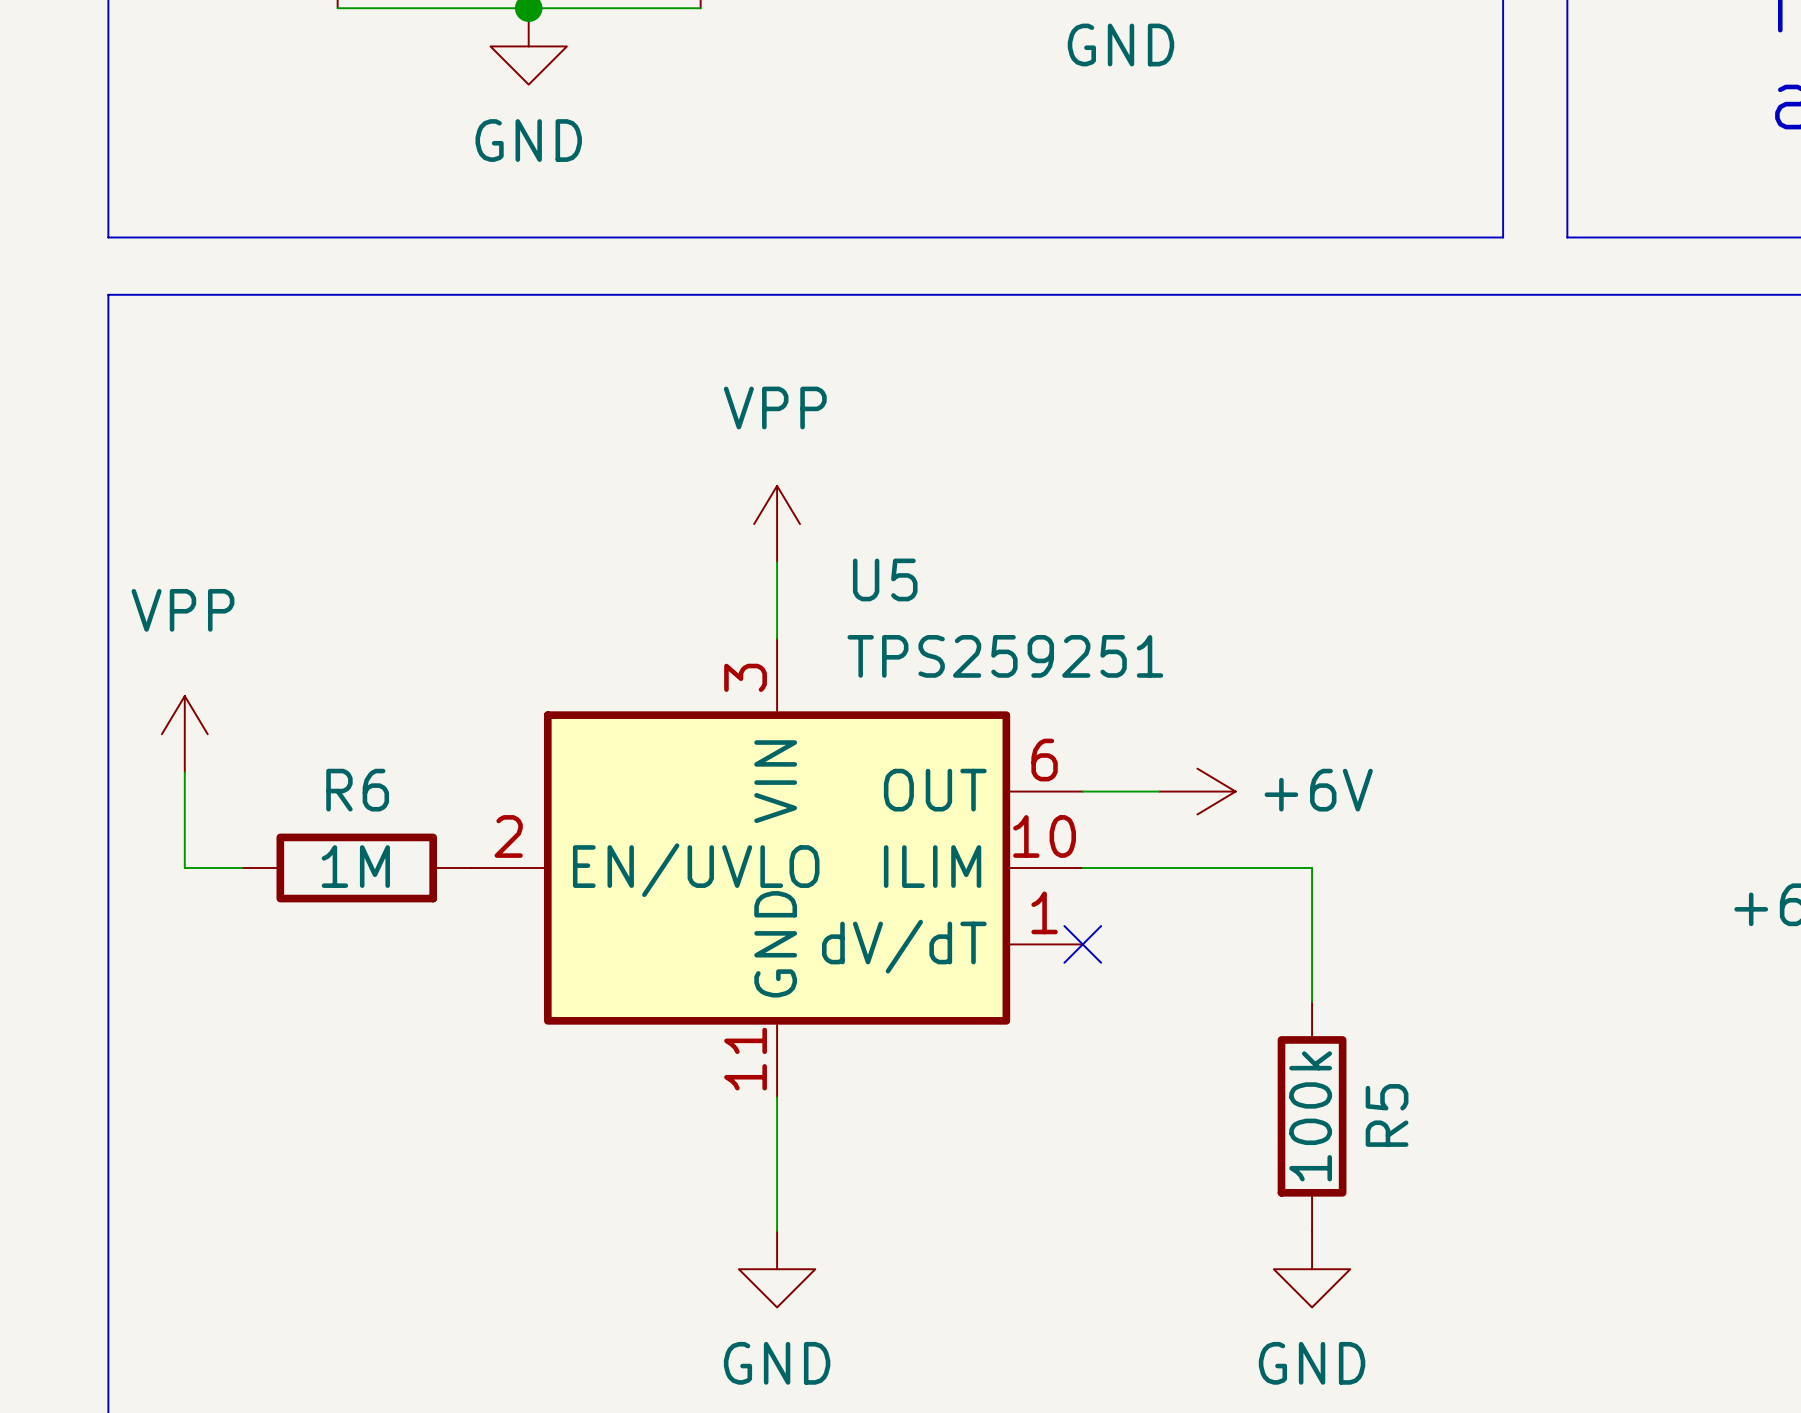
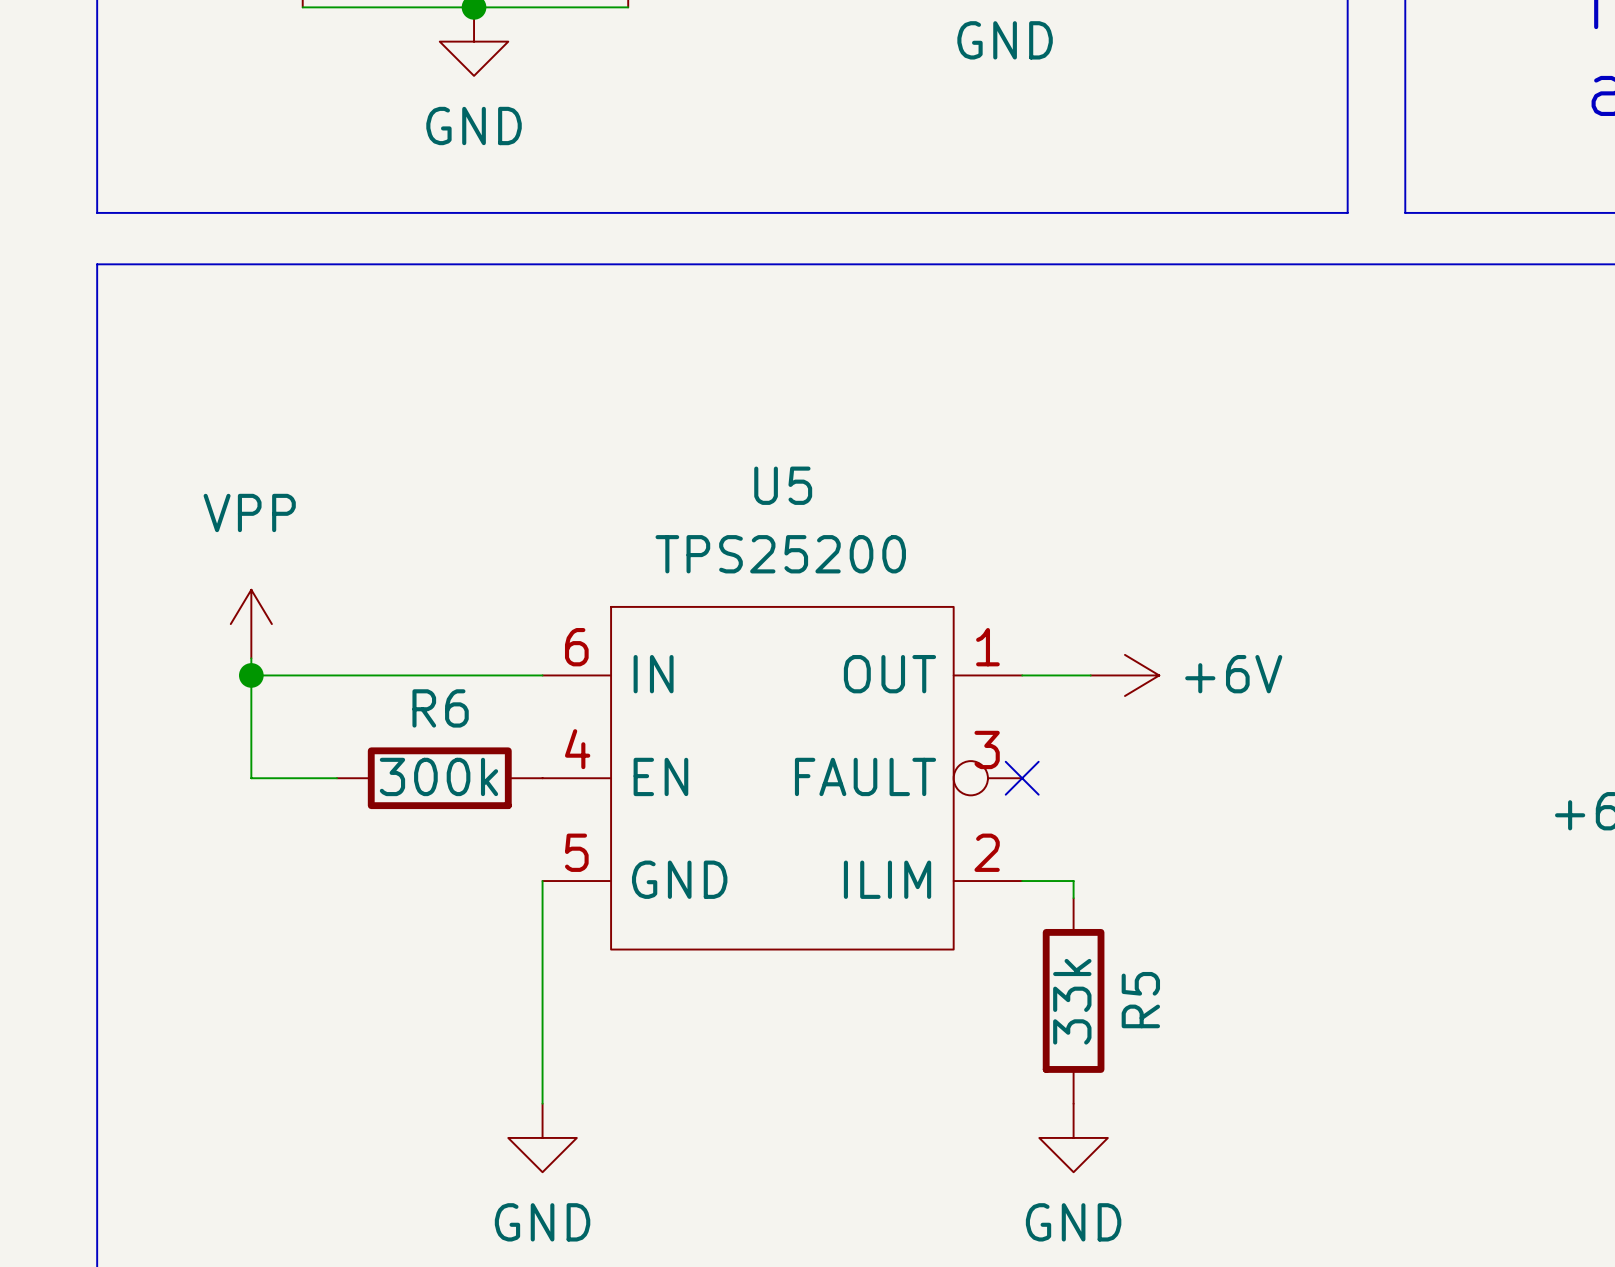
power symbol: VPP (777, 524) -> none
wire: (777, 562) (777, 638) -> none
U5 name position: U5 (885, 579) -> U5 (783, 485)
U5 symbol: [471, 638, 1083, 1098] -> [542, 606, 1023, 950]
U5 value: TPS259251 (1005, 656) -> TPS25200 (780, 554)
power symbol position: VPP (184, 734) -> VPP (251, 624)
wire: none -> (251, 658) (251, 778) (336, 778)
wire: none -> (251, 675) (542, 675)
junction: none -> (251, 675)
wire: (184, 772) (184, 867) (242, 867) -> none
wire: (1082, 791) (1159, 791) -> (1022, 675) (1090, 675)
power symbol position: +6V (1197, 791) -> +6V (1124, 675)
R6 value: 1M (355, 866) -> 300k (438, 776)
R6 position: (356, 867) -> (439, 778)
wire: (1082, 867) (1312, 867) (1312, 1001) -> none
no-connect mark position: (1082, 944) -> (1022, 778)
wire: none -> (542, 881) (542, 1103)
wire: none -> (1022, 881) (1073, 881) (1073, 898)
wire: (777, 1097) (777, 1231) -> none
R5 value: 100k (1310, 1116) -> 33k (1072, 1001)
R5 position: (1312, 1116) -> (1073, 1000)
power symbol position: GND (777, 1269) -> GND (542, 1137)
power symbol position: GND (1312, 1269) -> GND (1073, 1137)

